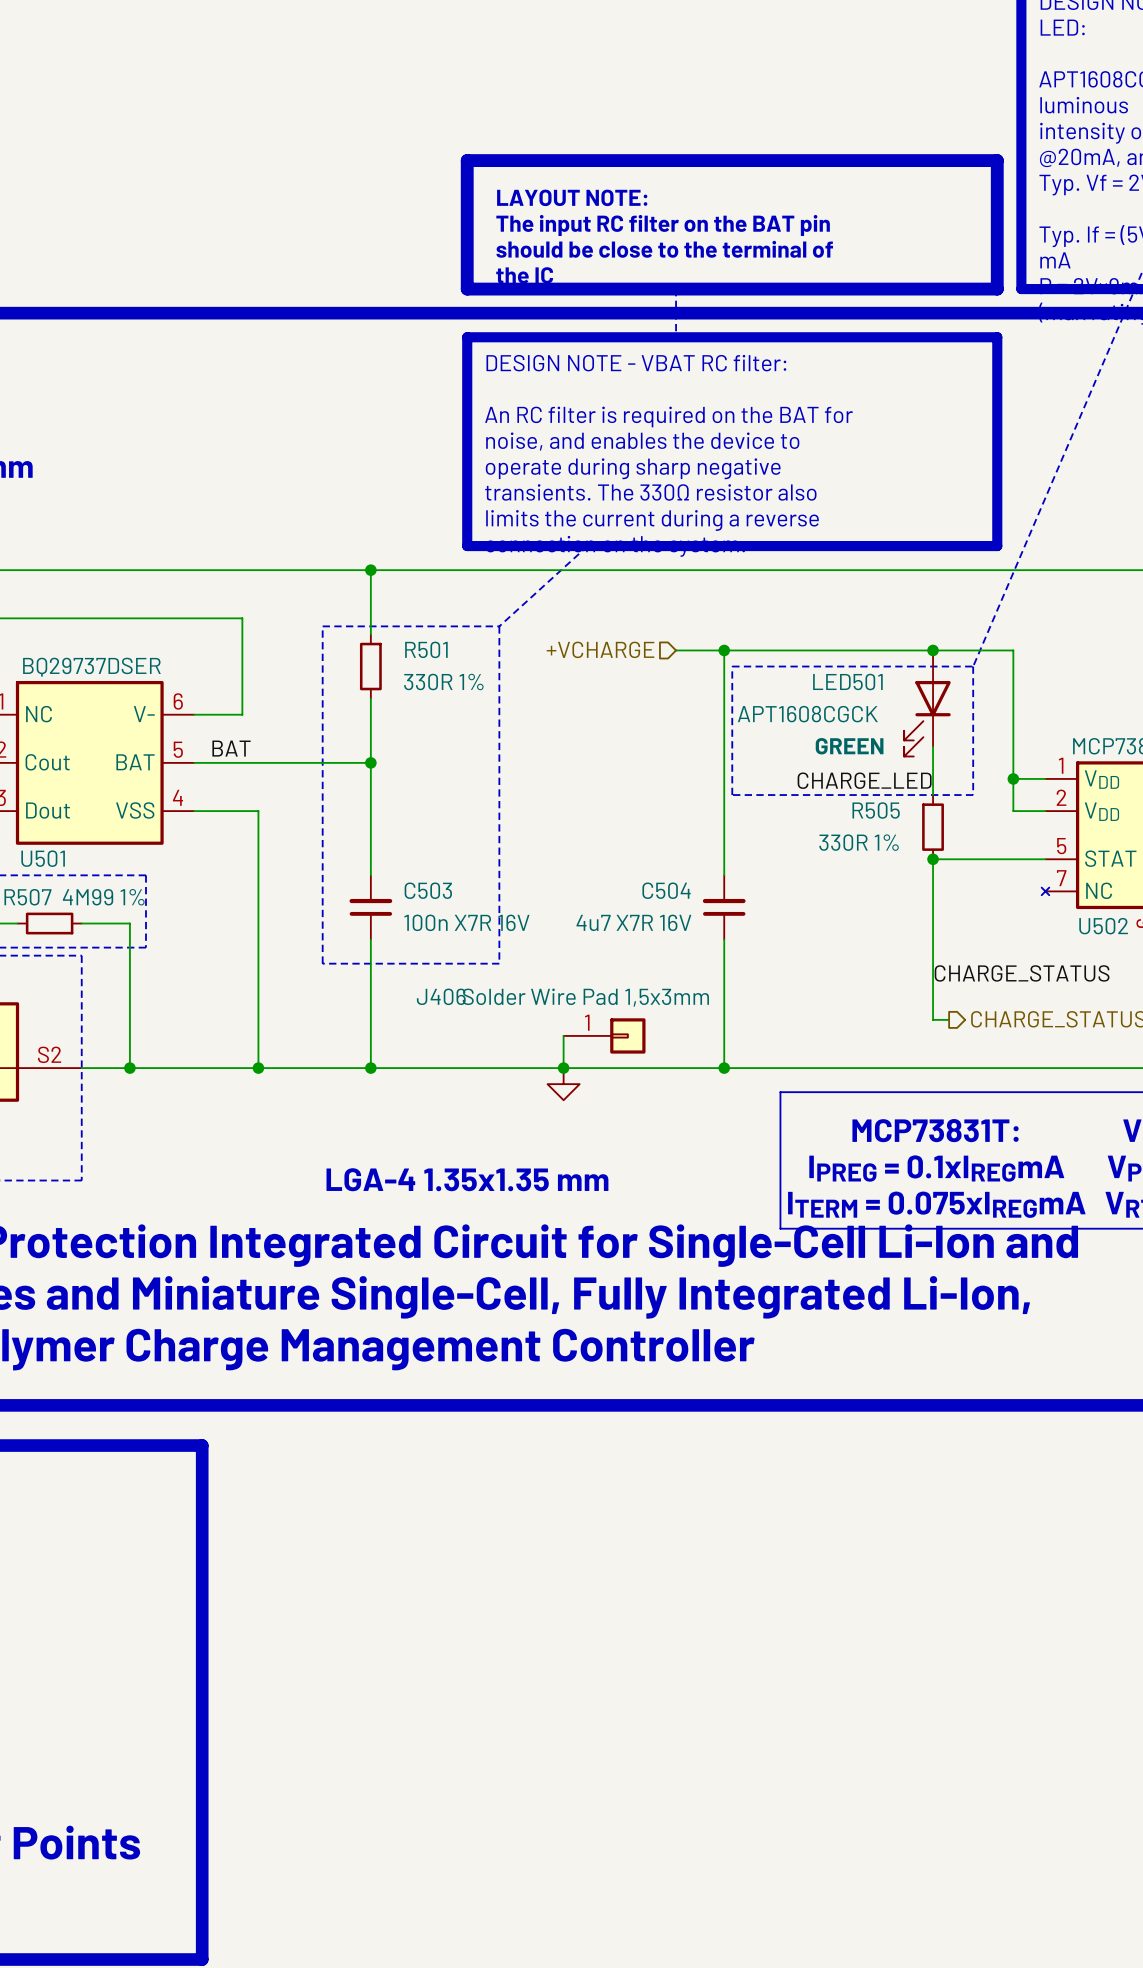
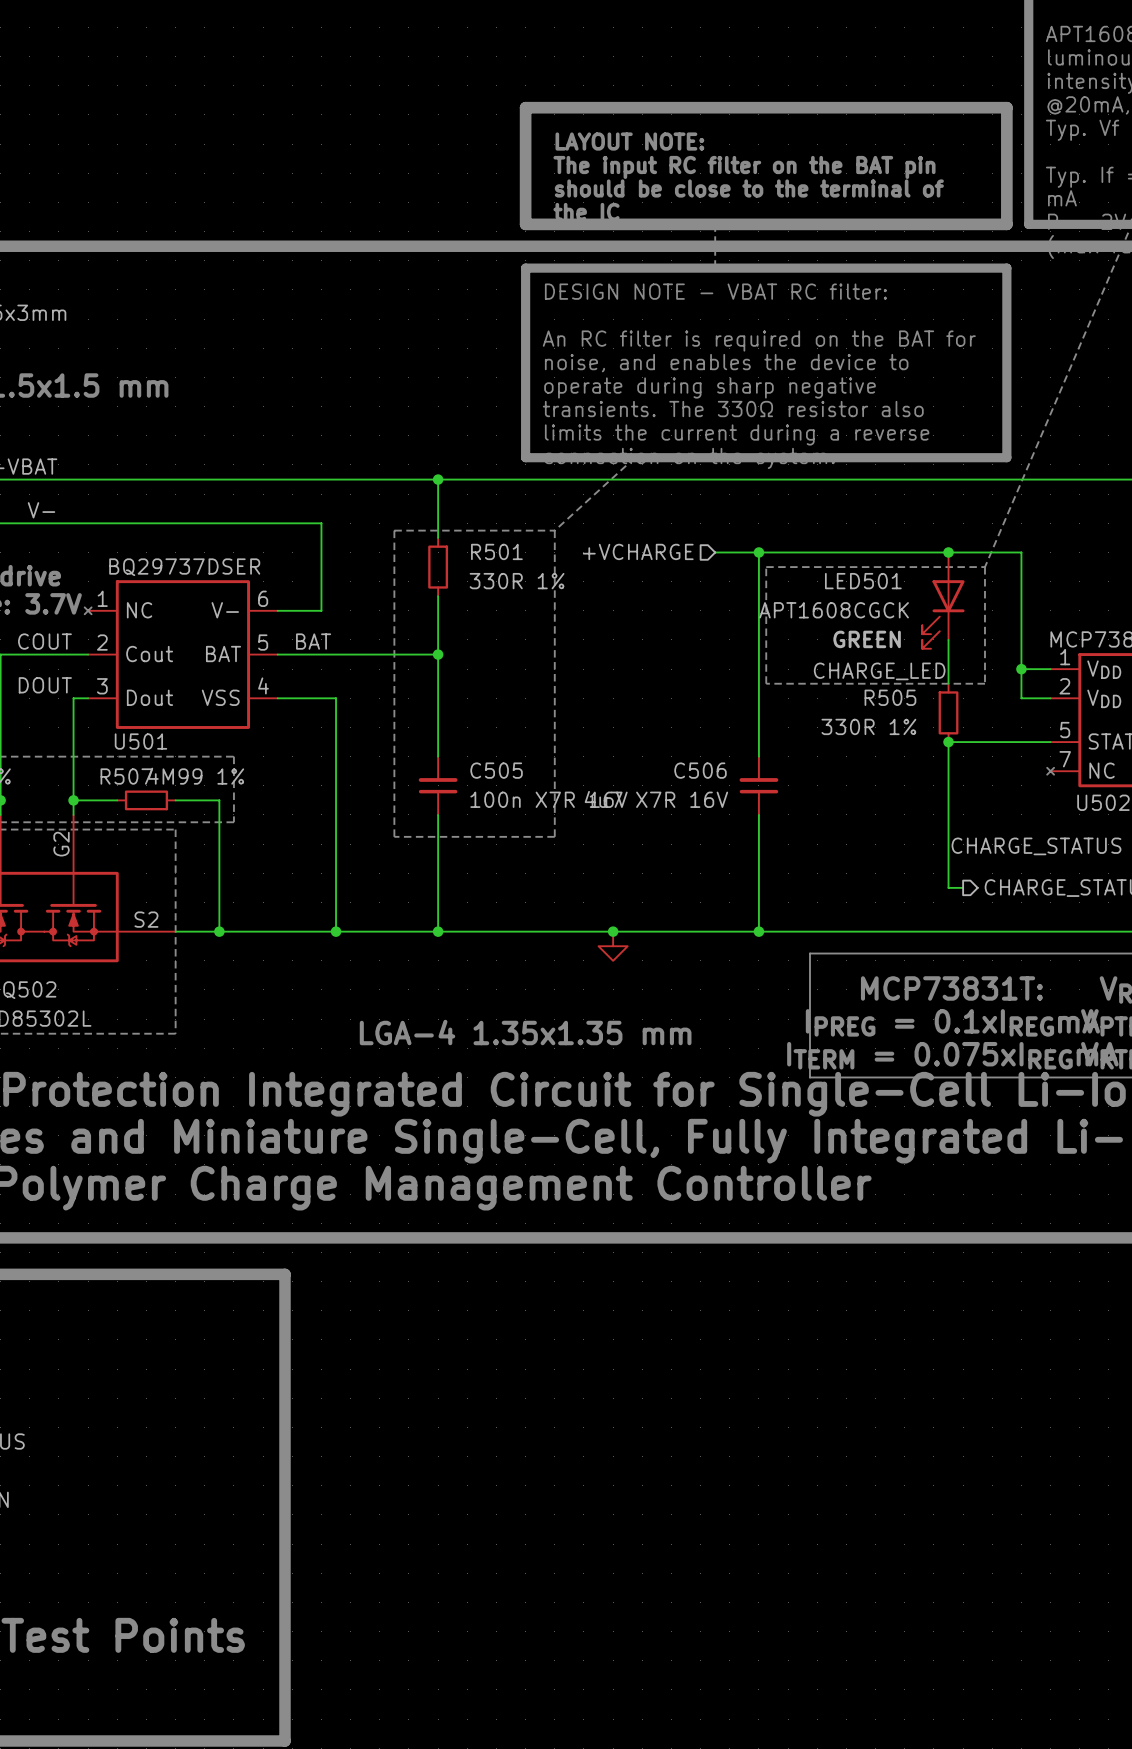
C503 name: C503 (428, 890) -> C505 (496, 770)
C504 name: C504 (666, 890) -> C506 (700, 770)
wire: (563, 1035) (563, 1068) -> none
J406: Solder Wire Pad 1,5x3mm (604, 1035) -> none

